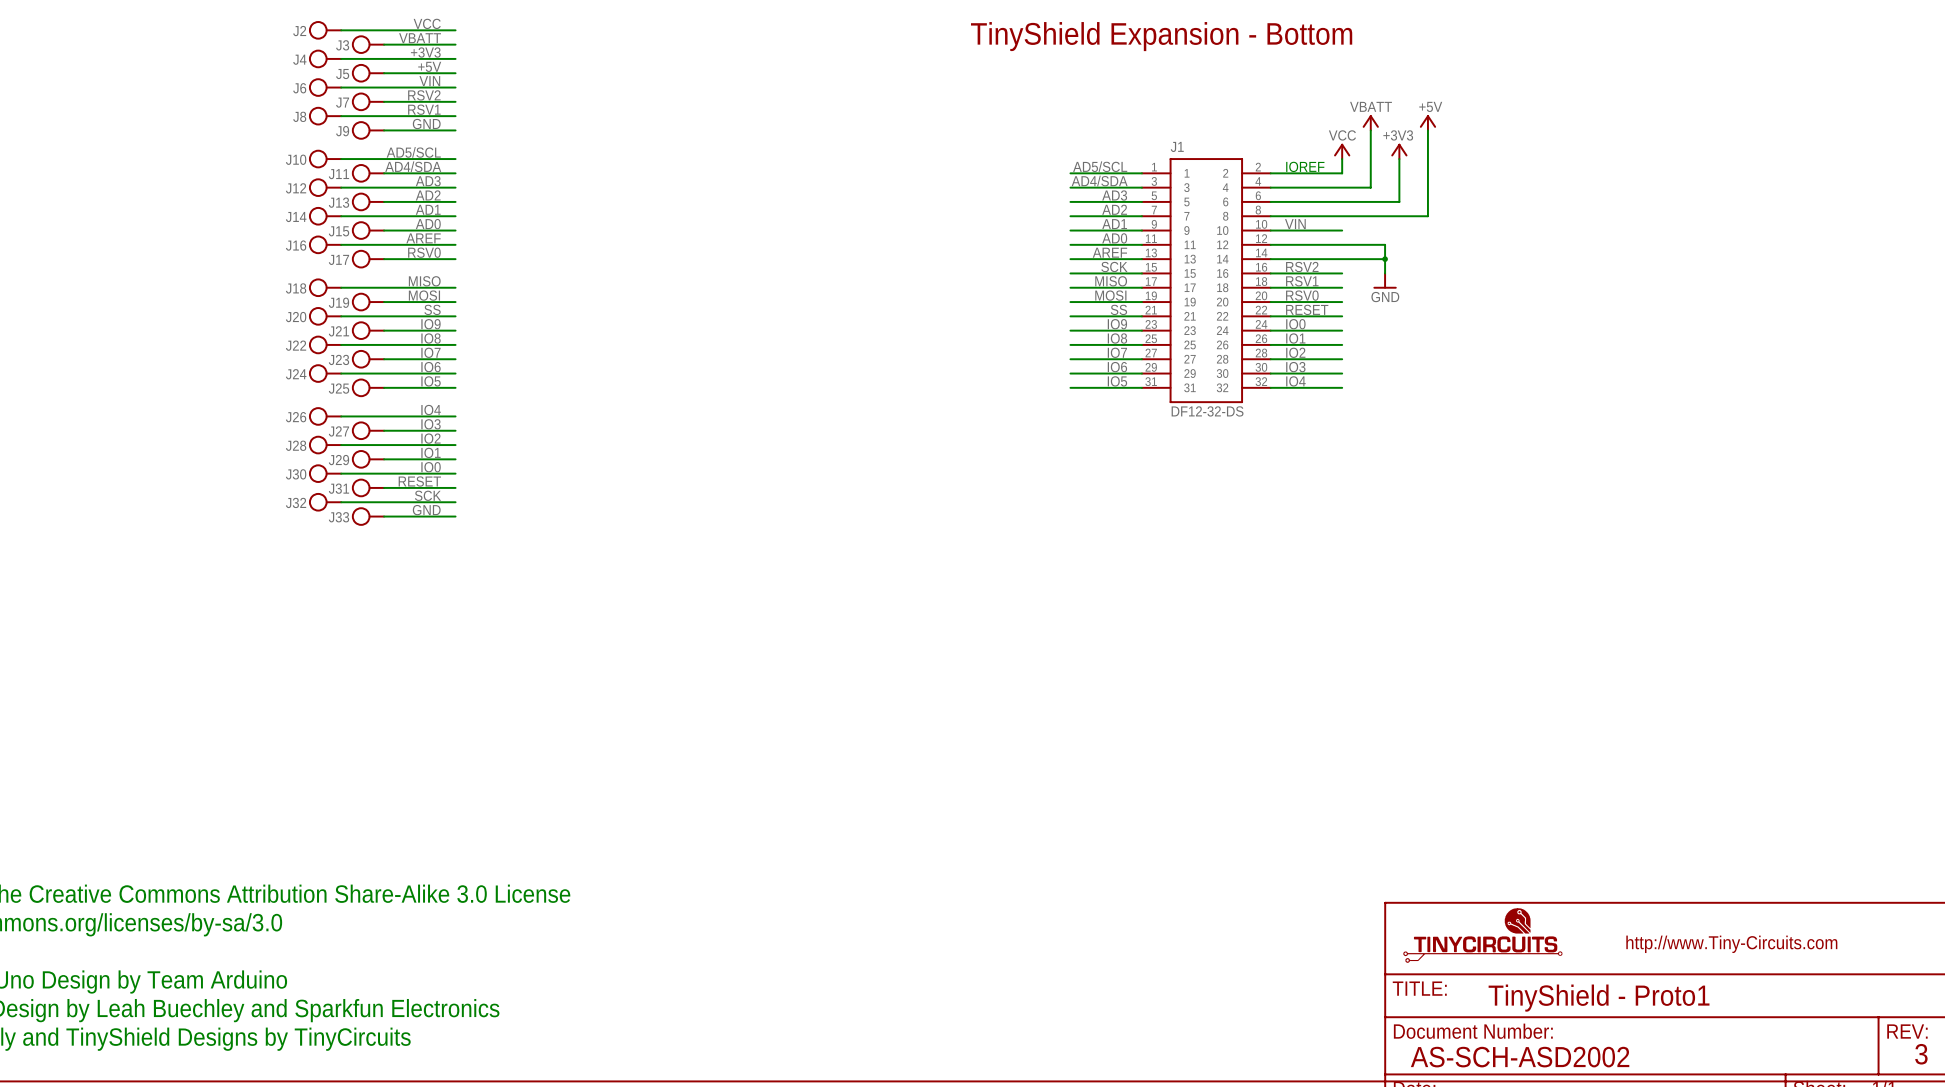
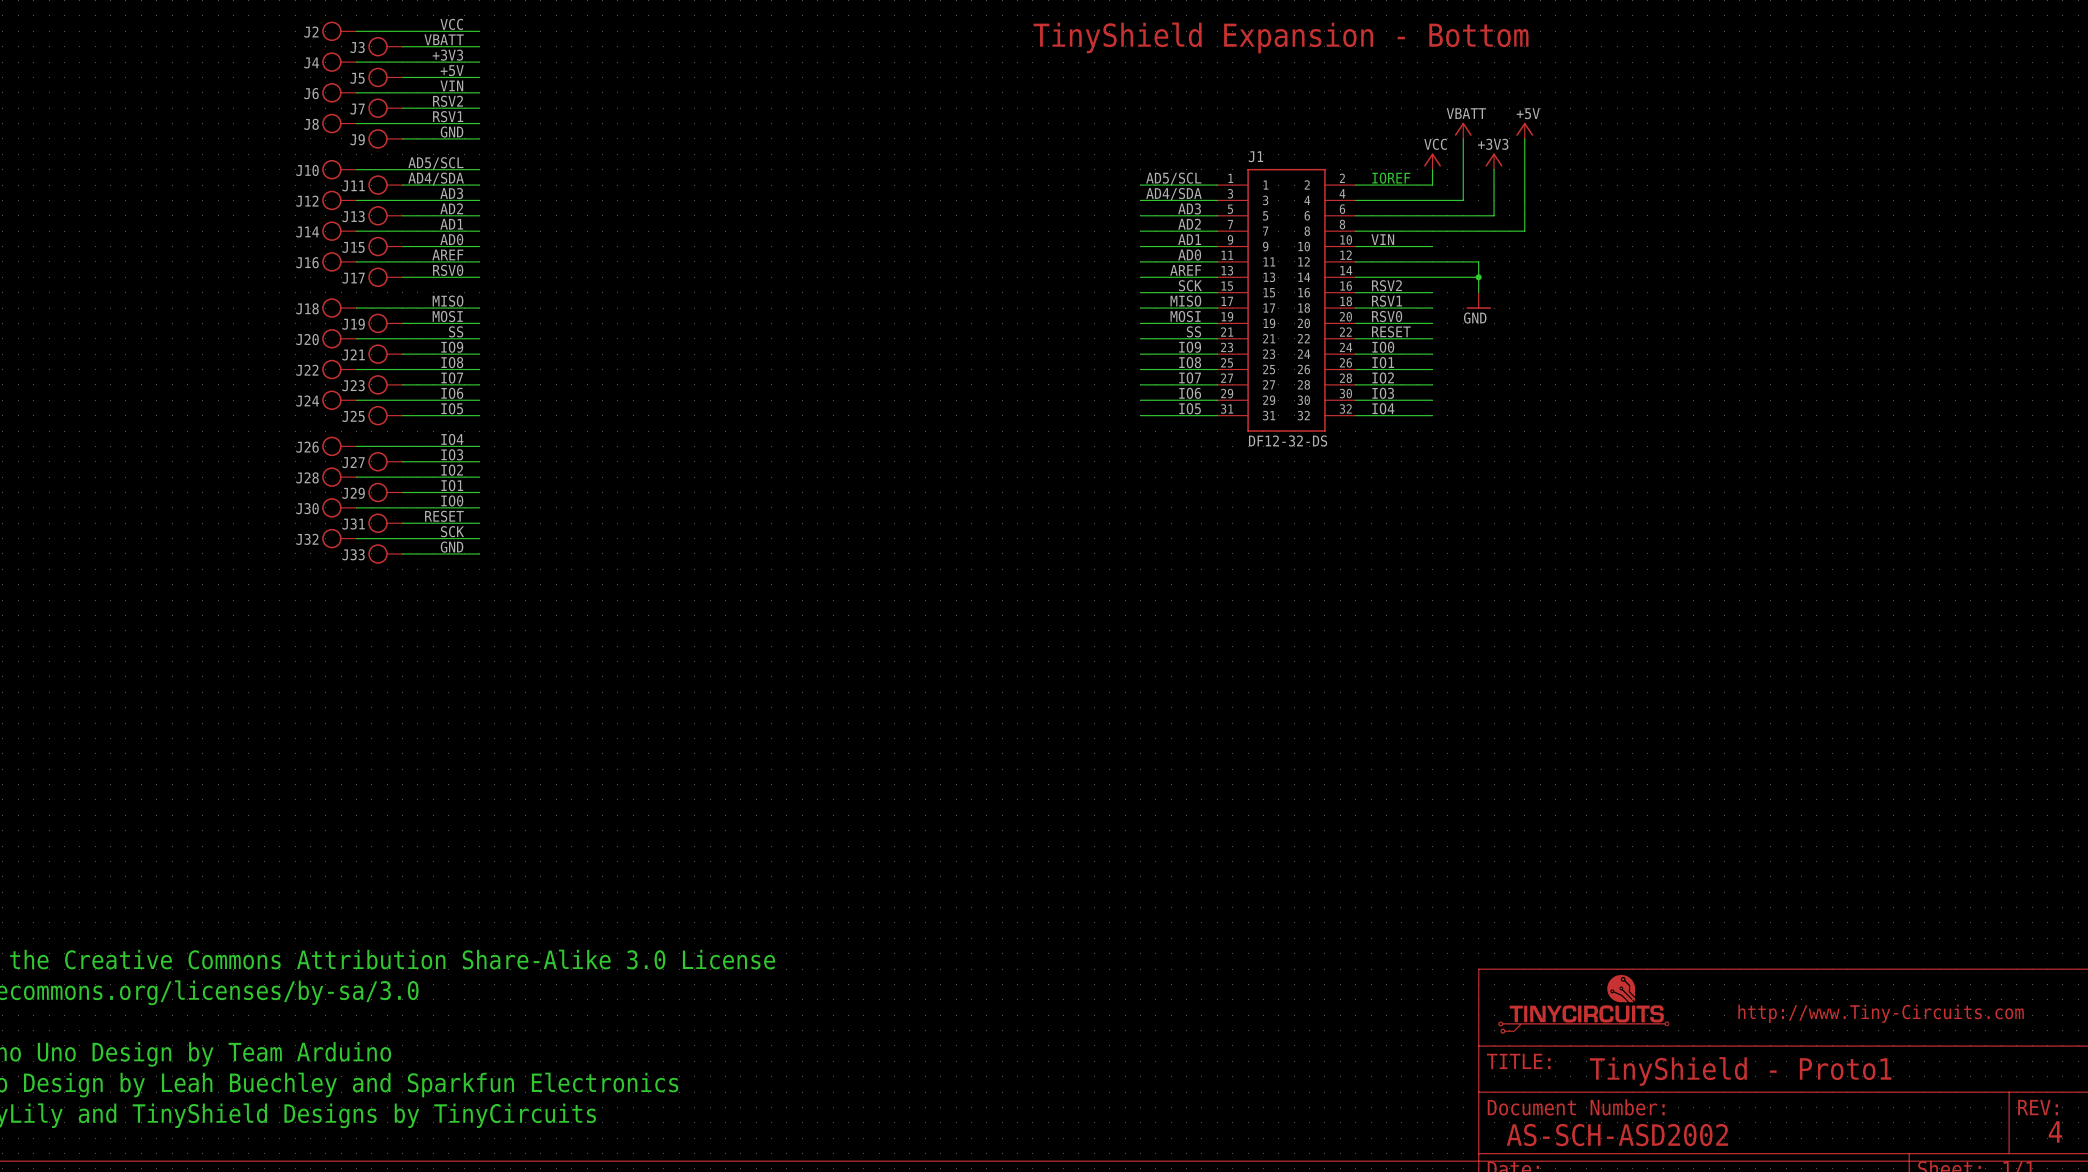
text: 3 (1921, 1054) -> 4 (2055, 1131)

